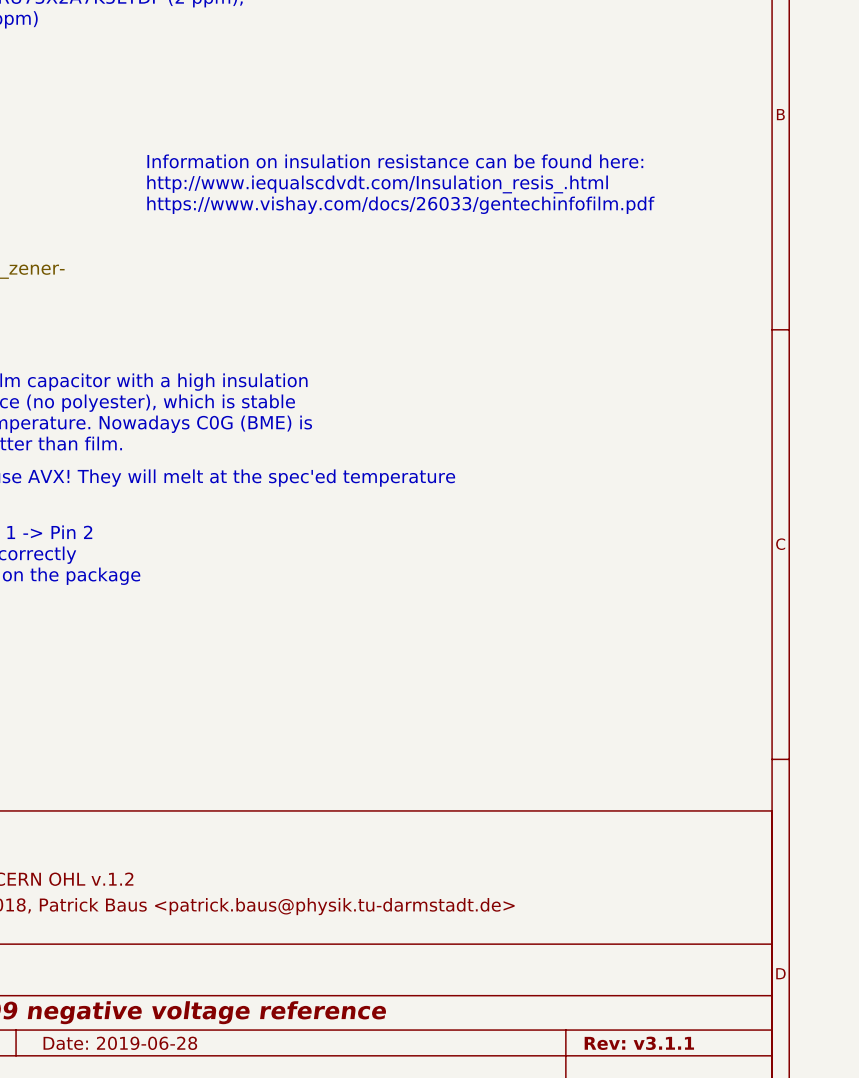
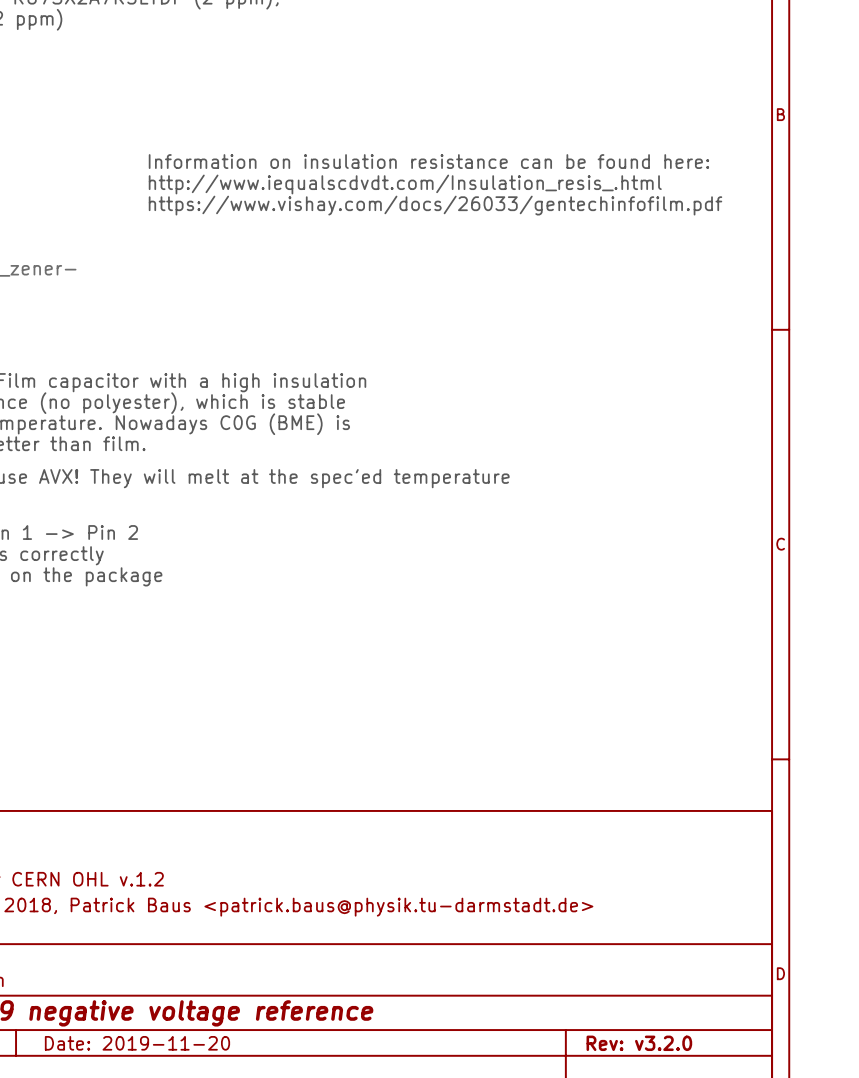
title block: Date: 2019-06-28 (120, 1043) -> Date: 2019-11-20 (137, 1043)
title block: Rev: v3.1.1 (639, 1043) -> Rev: v3.2.0 (639, 1043)

